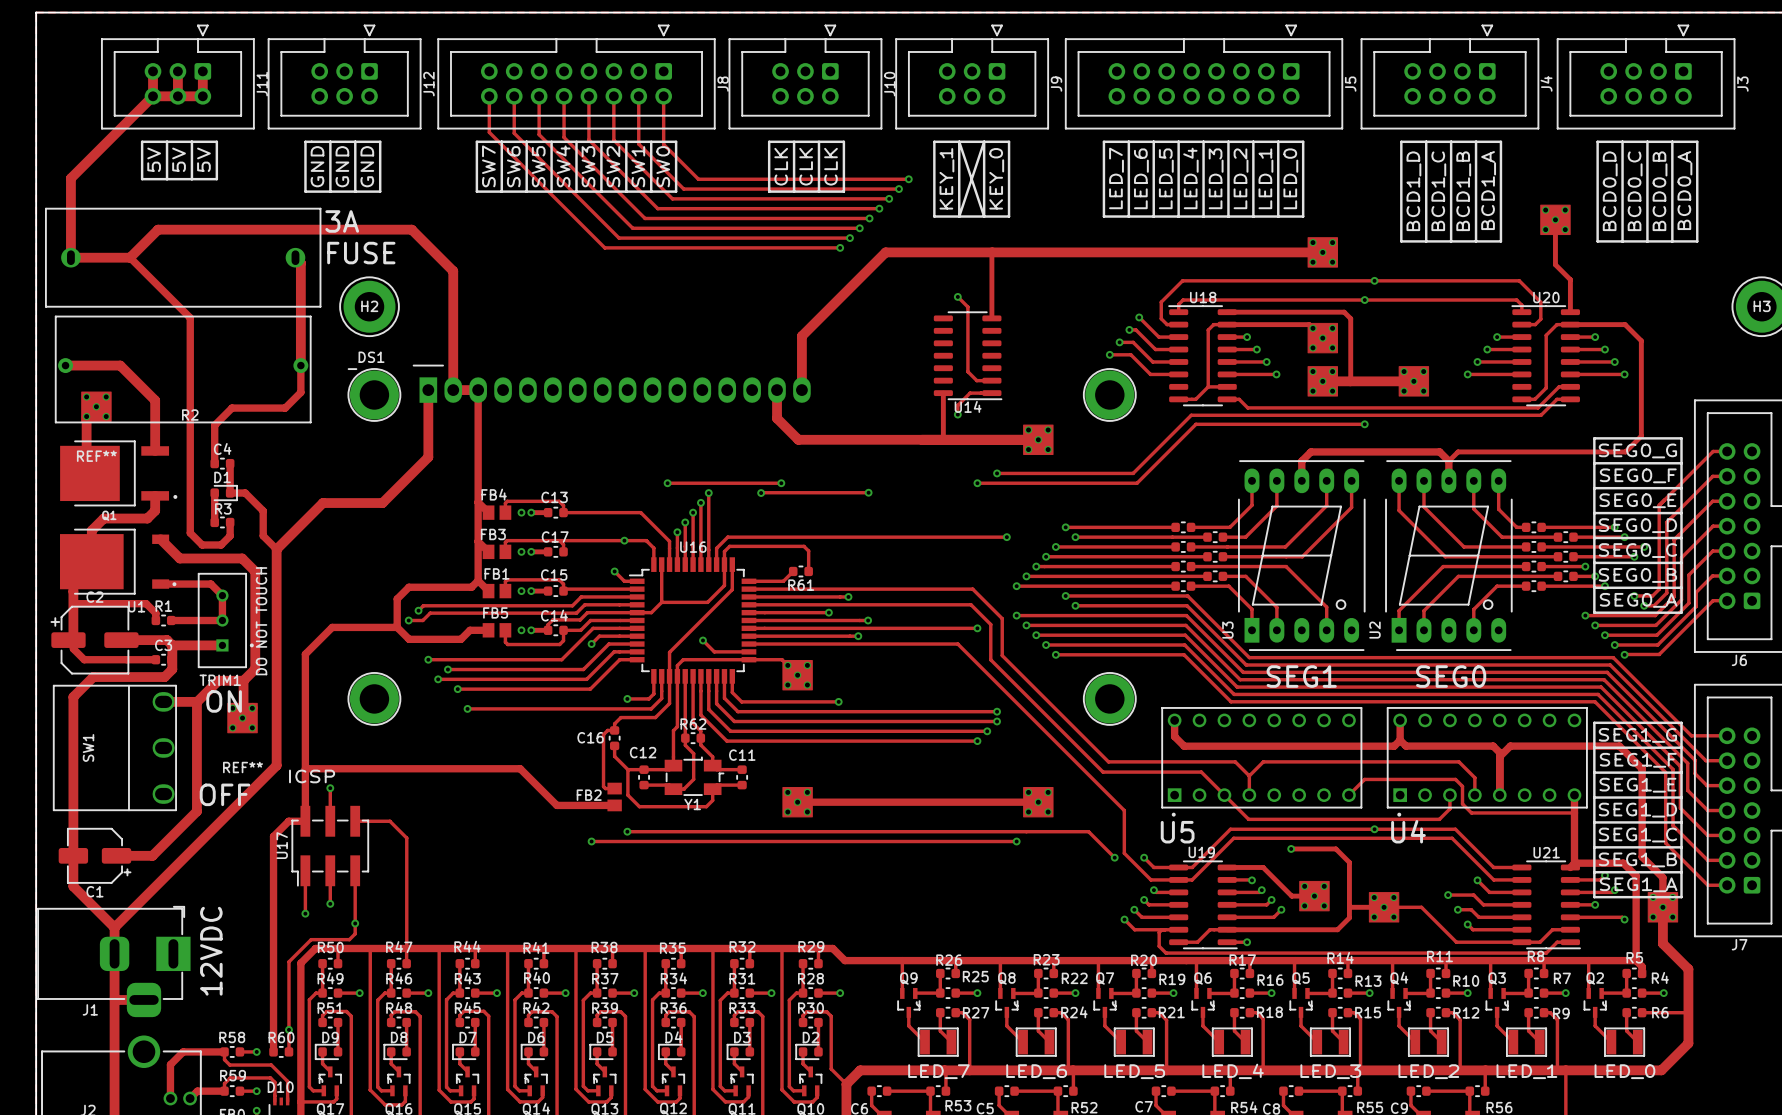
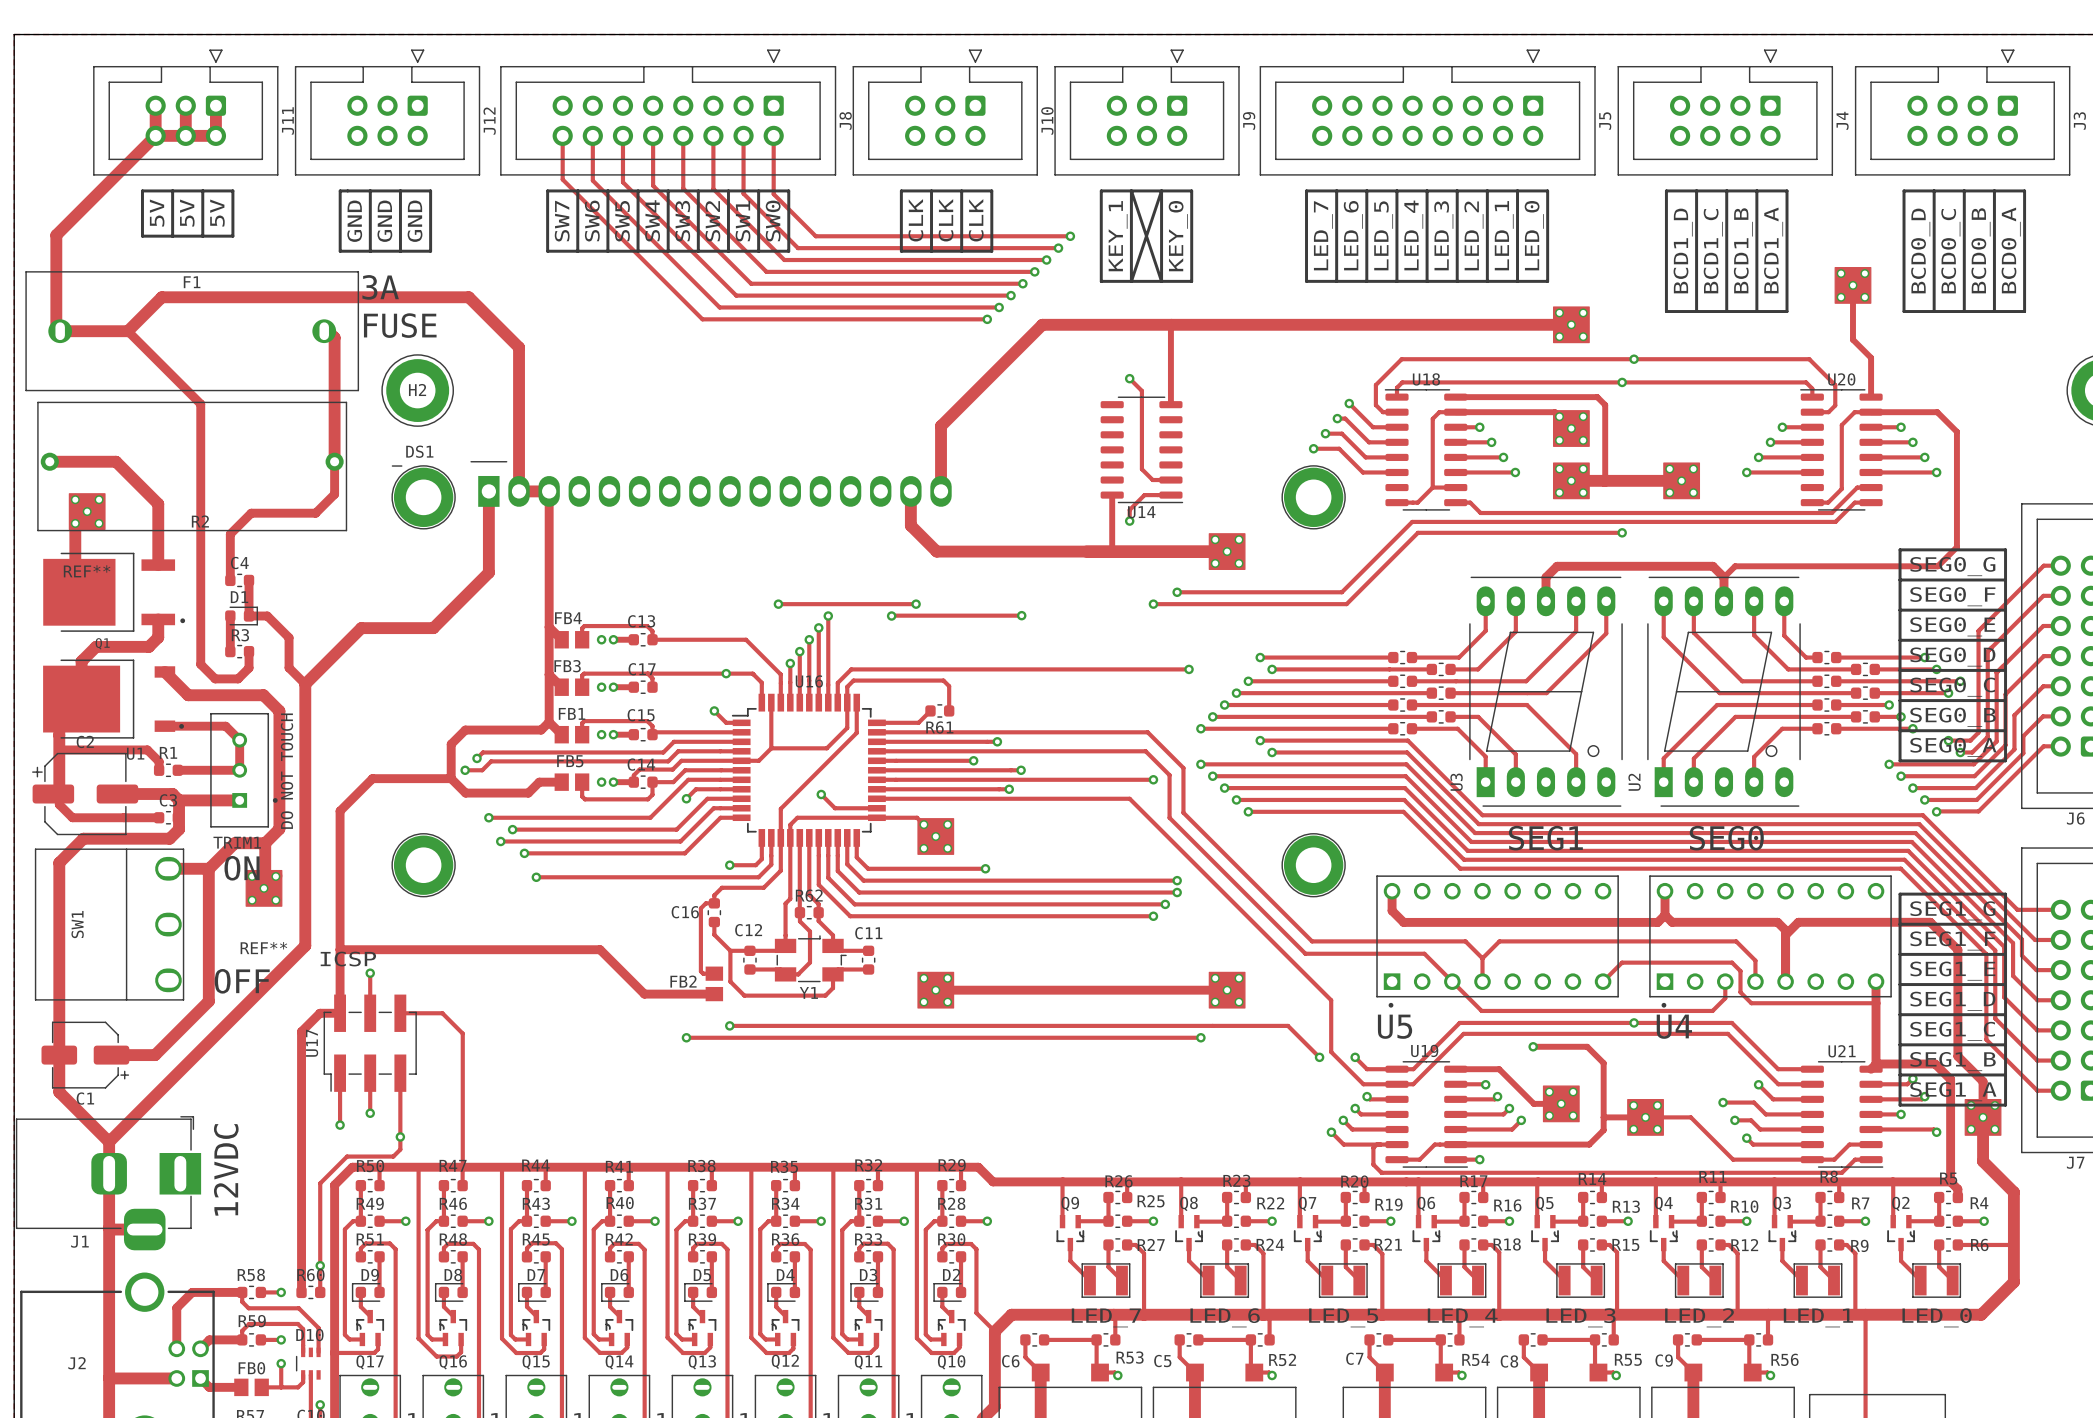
part: (183, 257) -> none
F1: none -> (192, 331)

